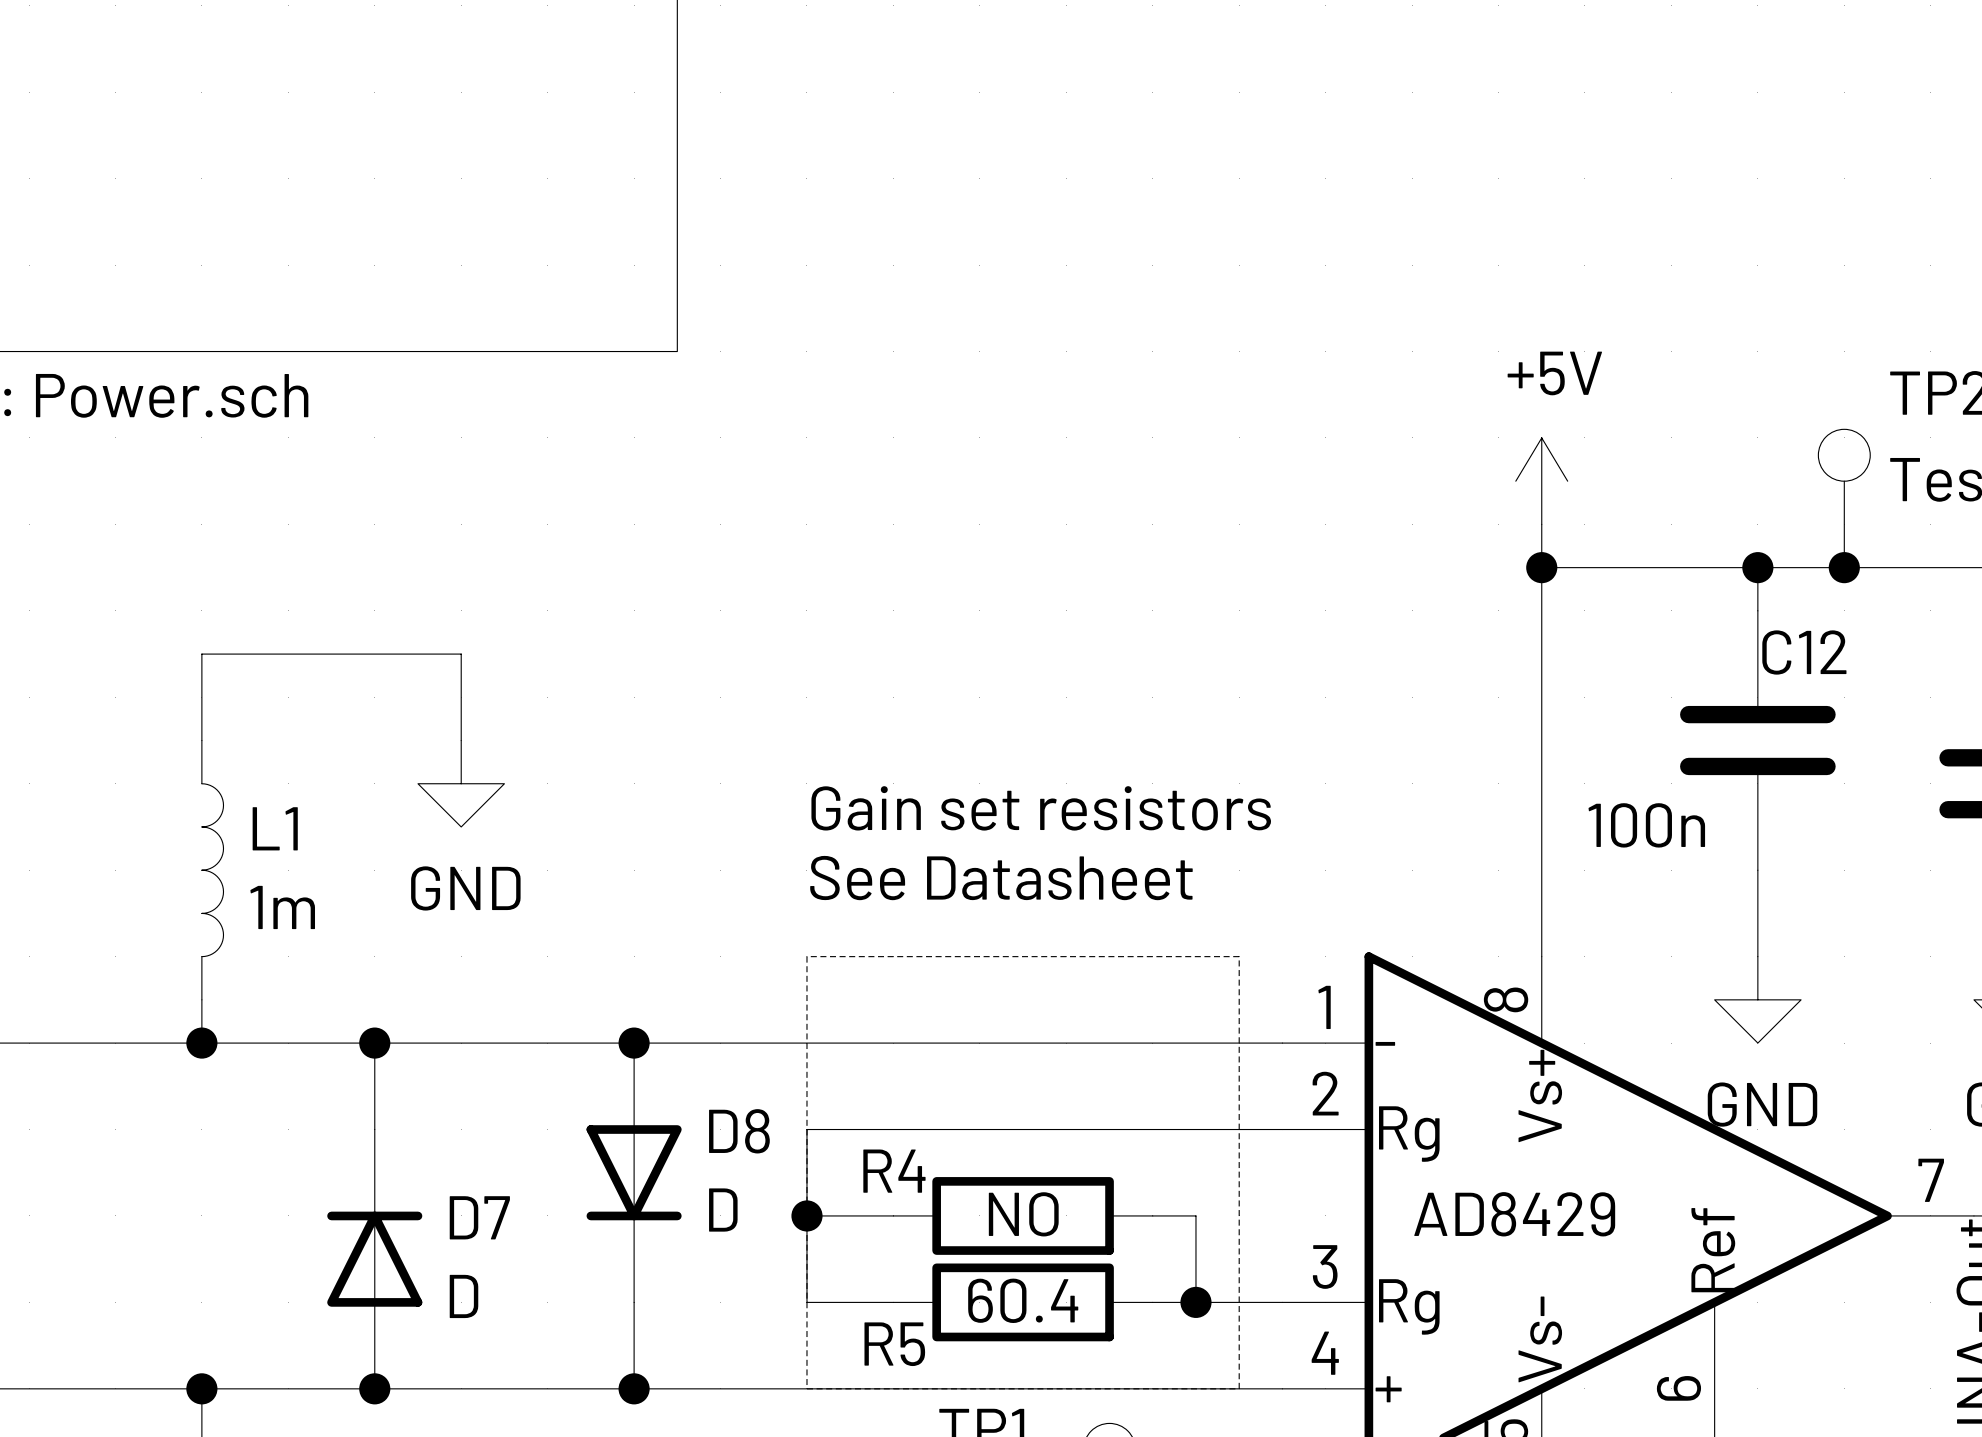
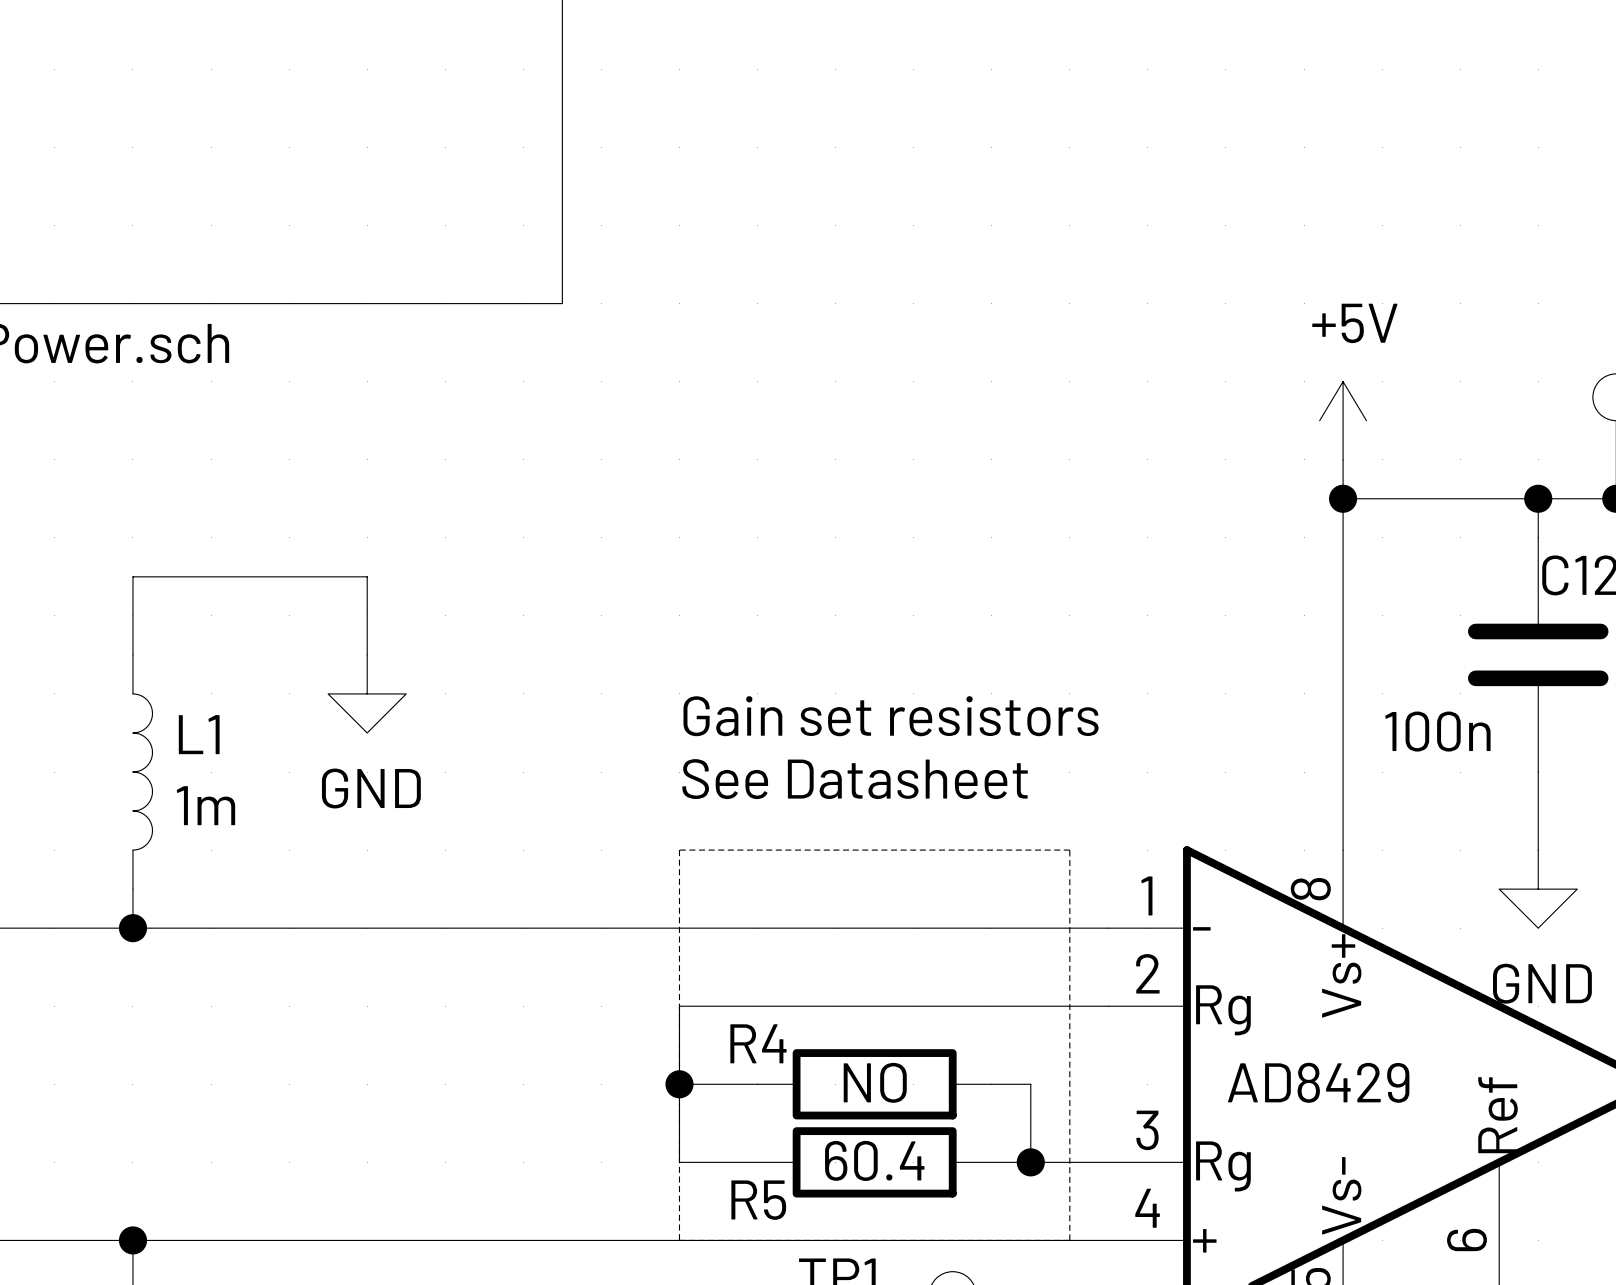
wire: (374, 1043) (374, 1129) -> none
junction: (374, 1043) -> none
junction: (634, 1043) -> none
D8: D (634, 1172) -> none
D7: D (374, 1259) -> none
wire: (634, 1302) (634, 1388) -> none
junction: (374, 1388) -> none
junction: (634, 1388) -> none

